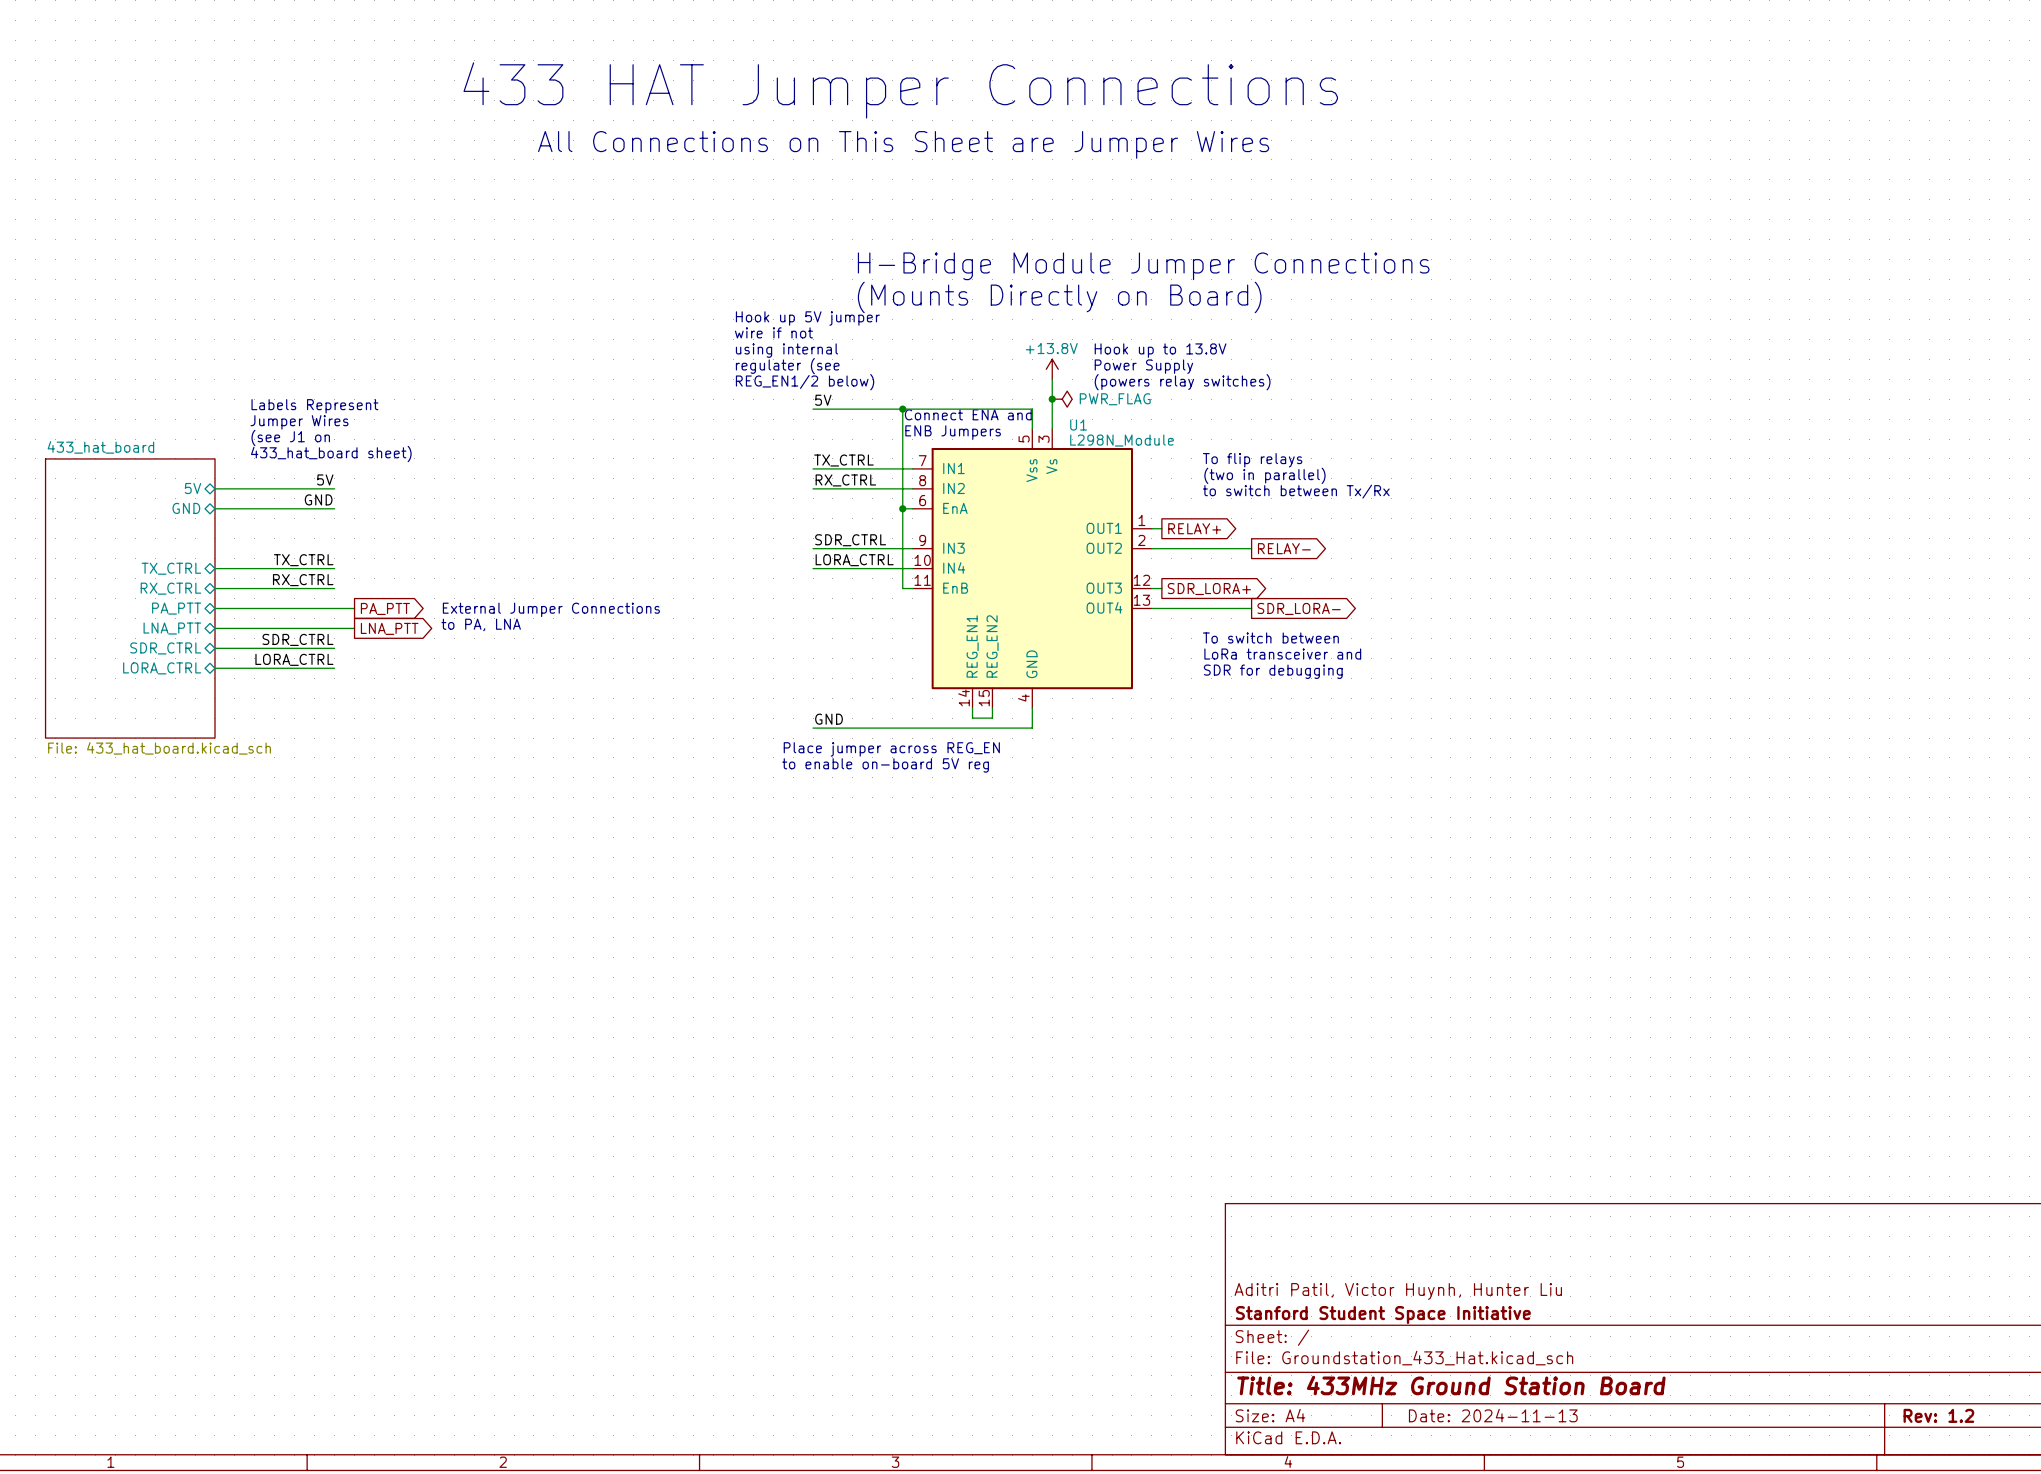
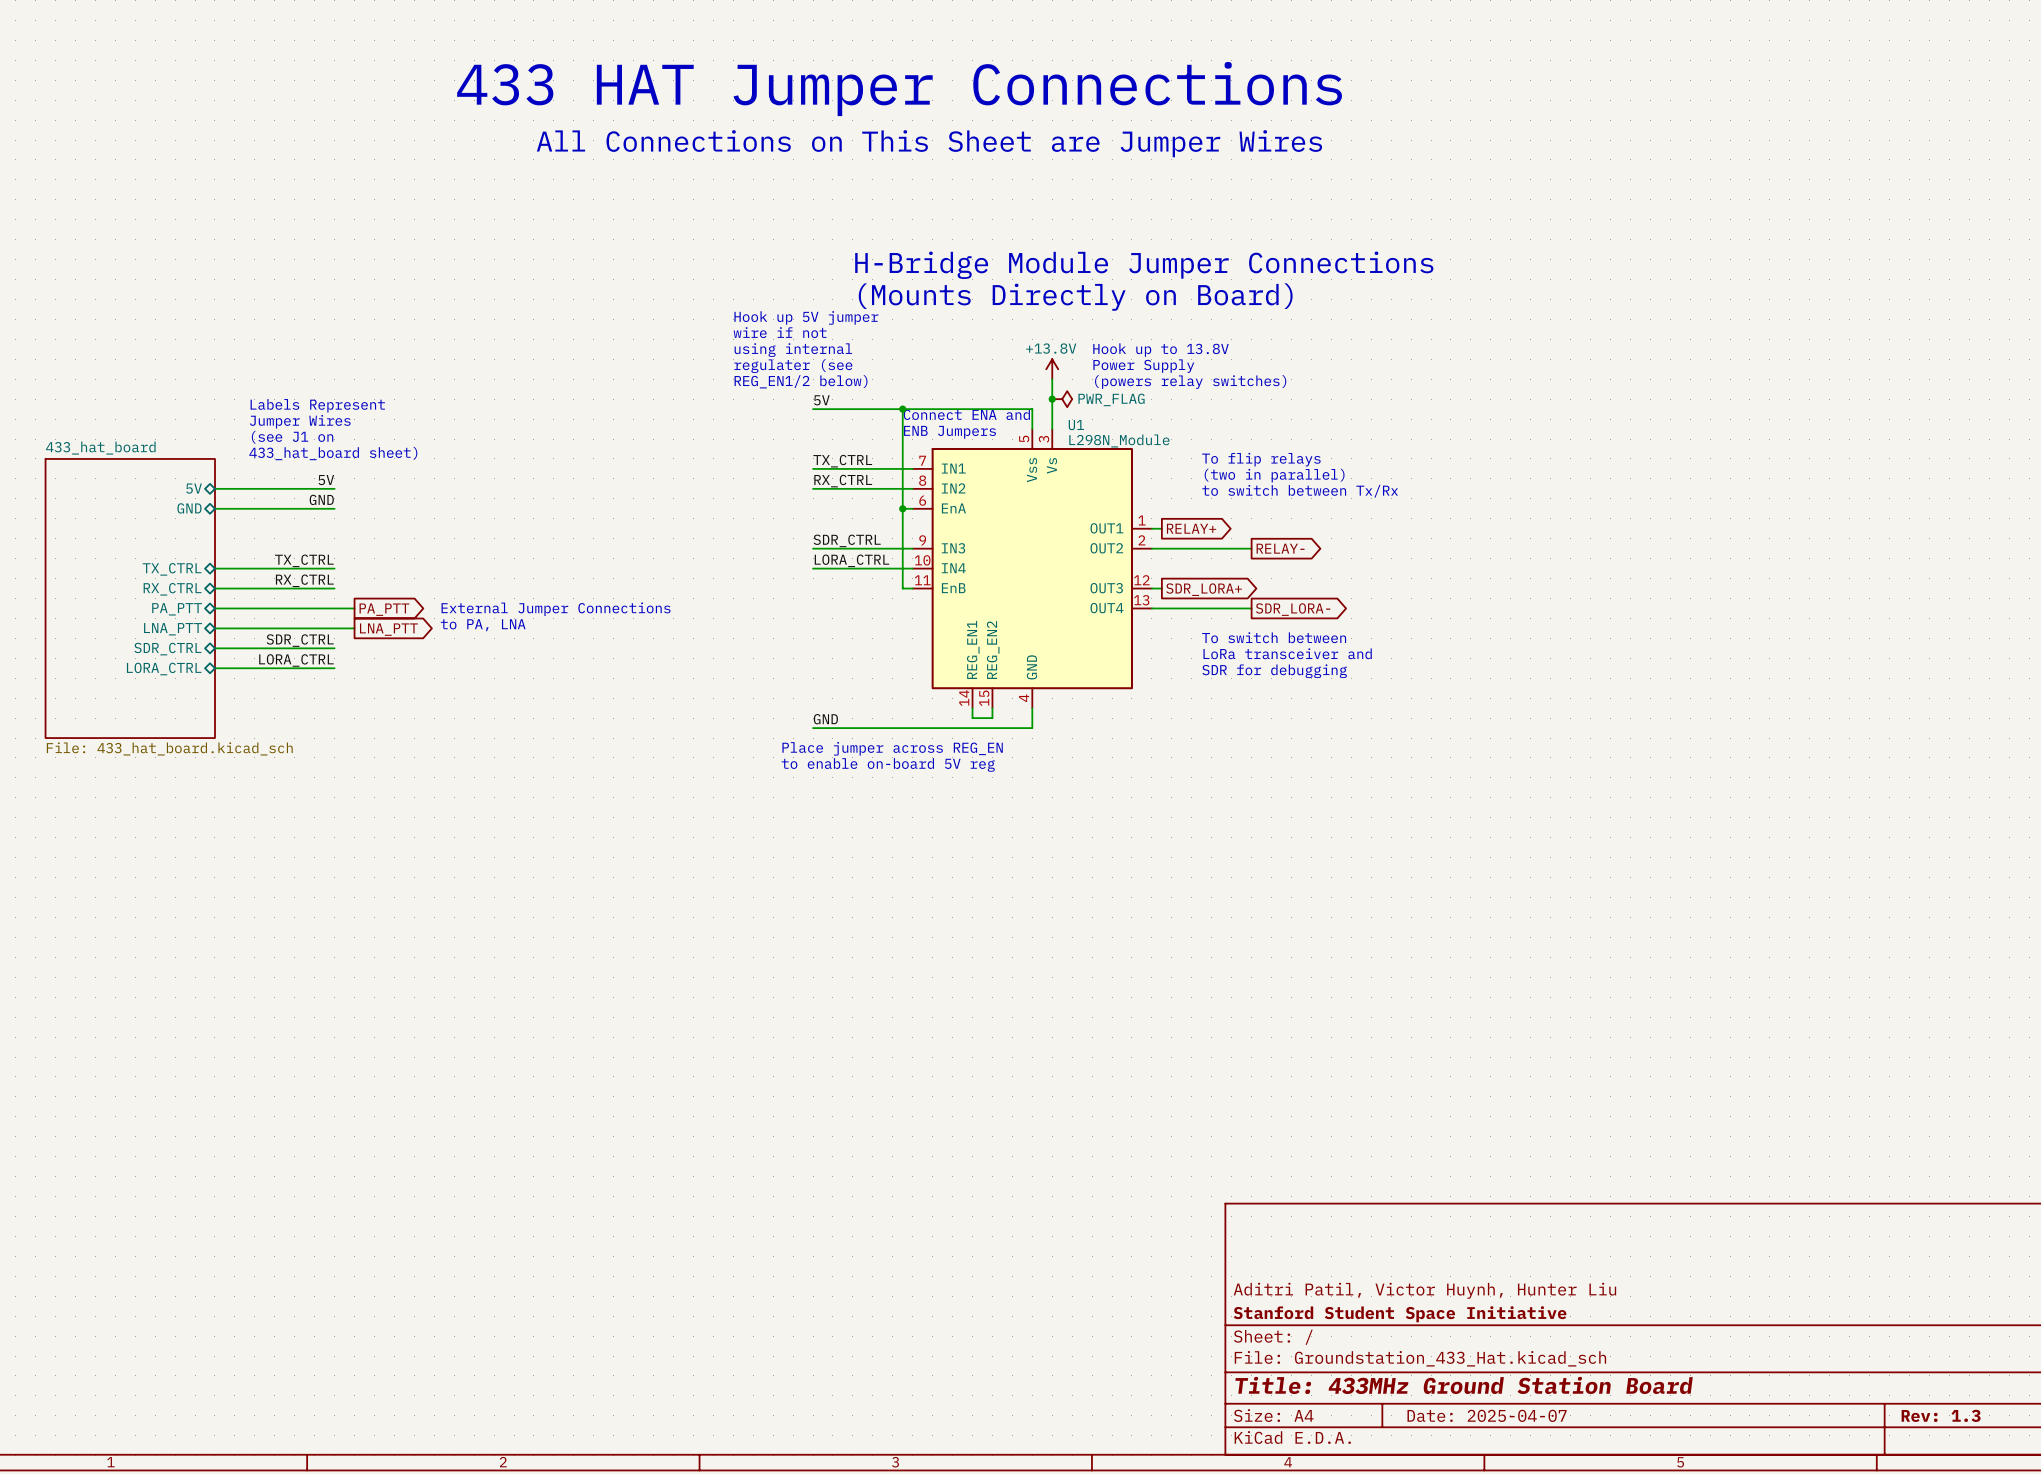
title block: Date: 2024-11-13 (1493, 1415) -> Date: 2025-04-07 (1487, 1415)
title block: Rev: 1.2 (1938, 1415) -> Rev: 1.3 (1941, 1415)

